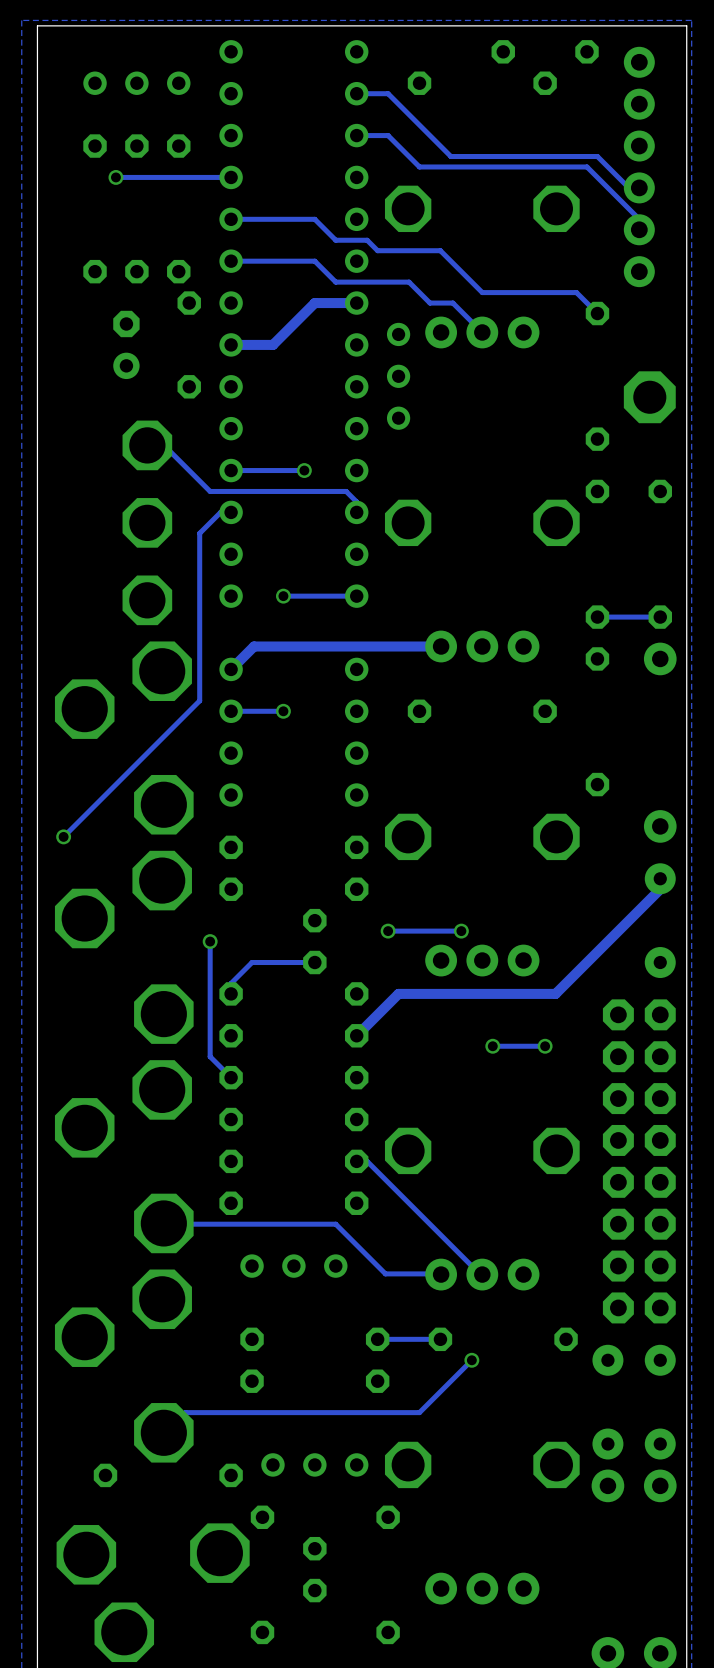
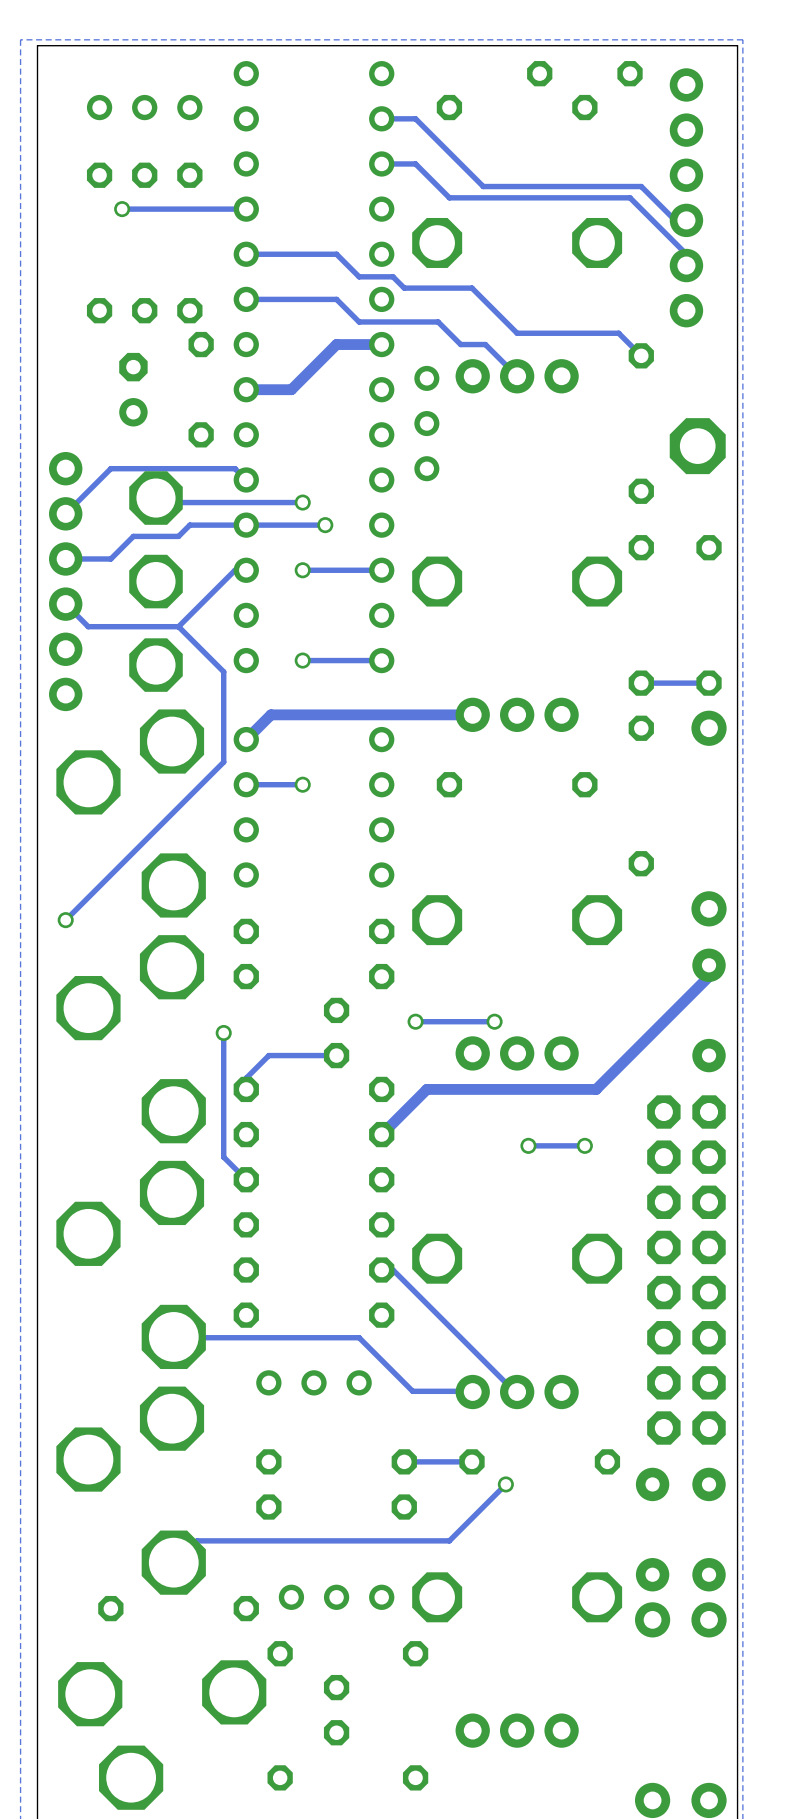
track: none -> (246, 479) (235, 468) (110, 468) (65, 513)
track: (147, 445) (164, 445) (210, 491) (346, 491) (356, 501) (356, 512) -> (156, 498) (160, 502) (302, 502)
via: none -> (302, 502)
track: none -> (246, 525) (189, 525) (178, 536) (133, 536) (110, 558) (65, 558)
via: none -> (302, 570)
track: none -> (381, 570) (302, 570)
part: none -> (65, 581)
track: (199, 533) (199, 700) -> (178, 626) (223, 671) (223, 762) (212, 773)
track: none -> (212, 592) (178, 626)
track: none -> (65, 604) (88, 626) (178, 626)

